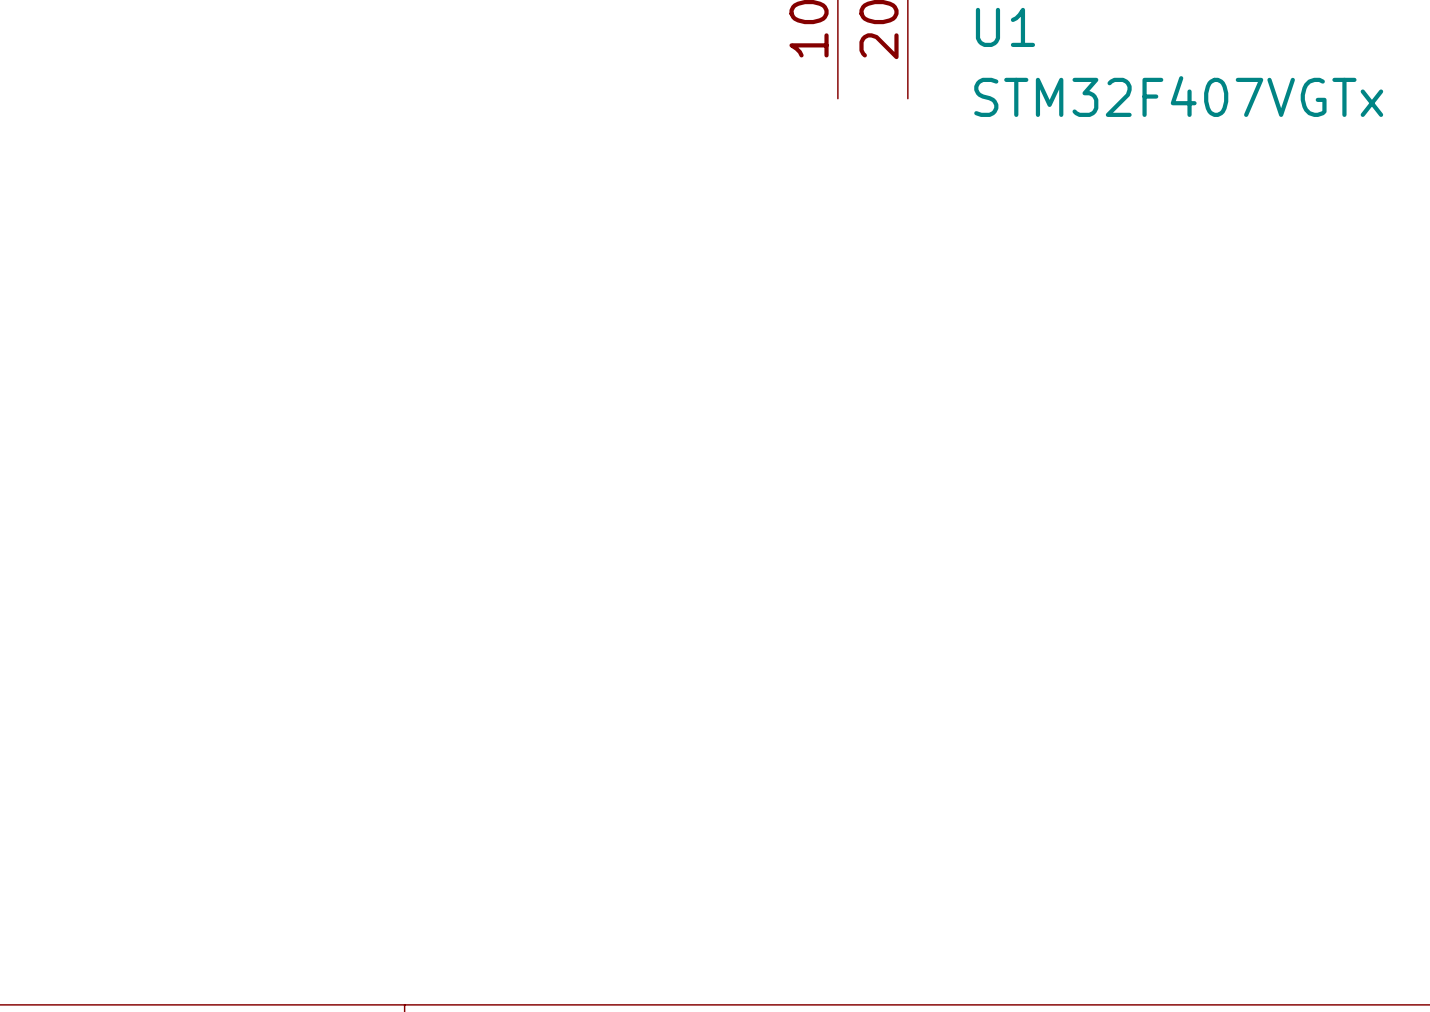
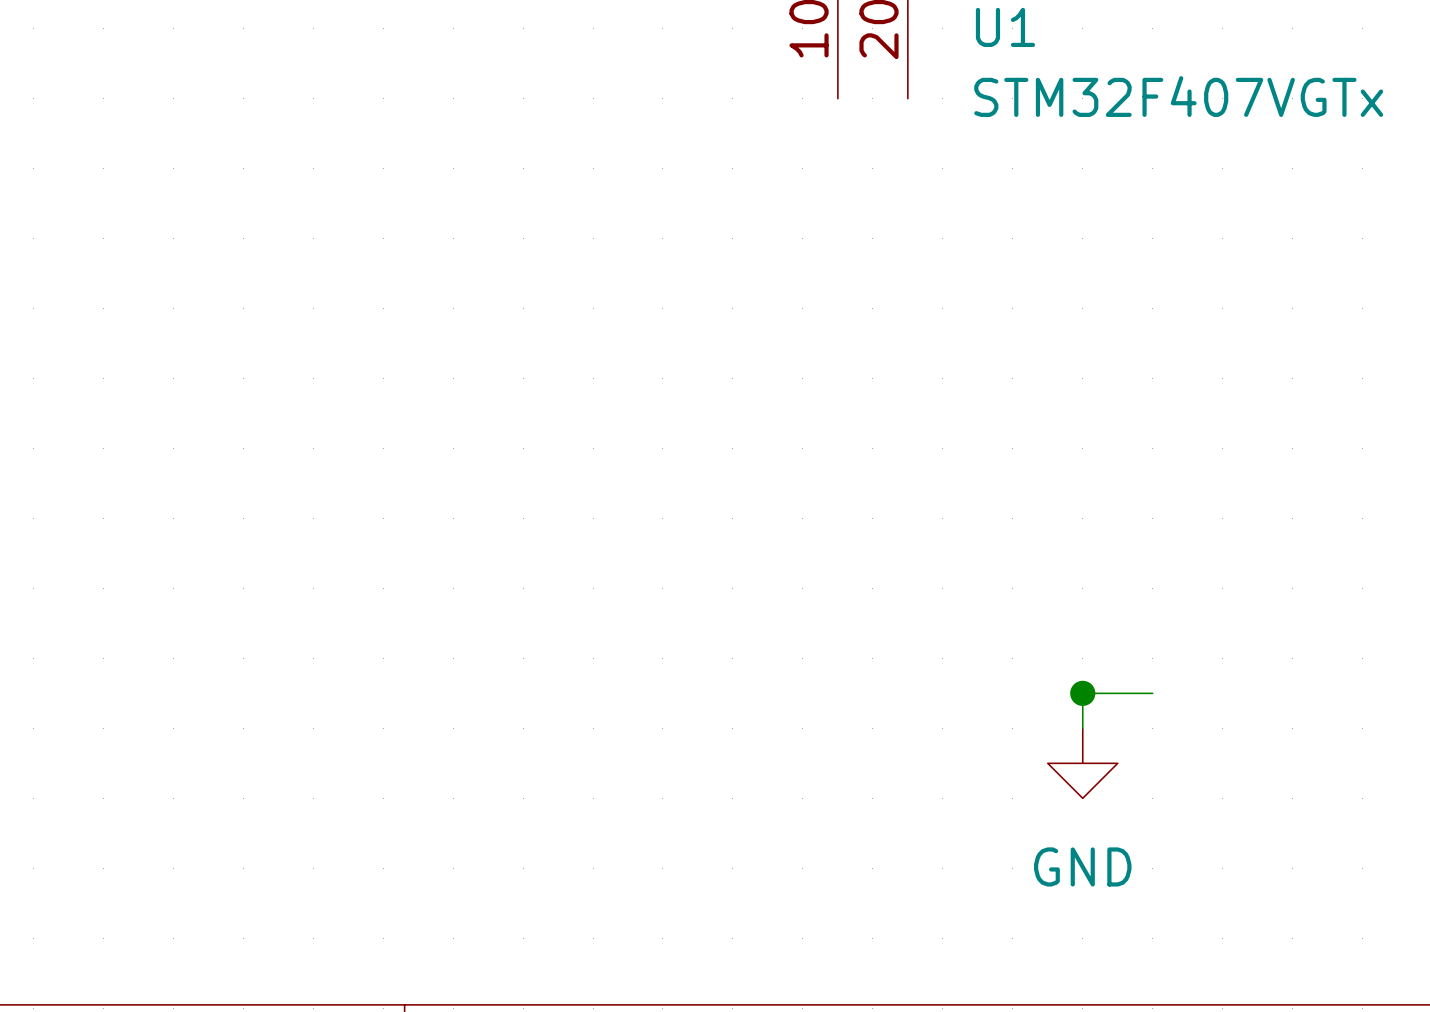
junction: none -> (1082, 693)
wire: none -> (1152, 693) (1082, 693) (1082, 728)
power symbol: none -> GND (1082, 763)

